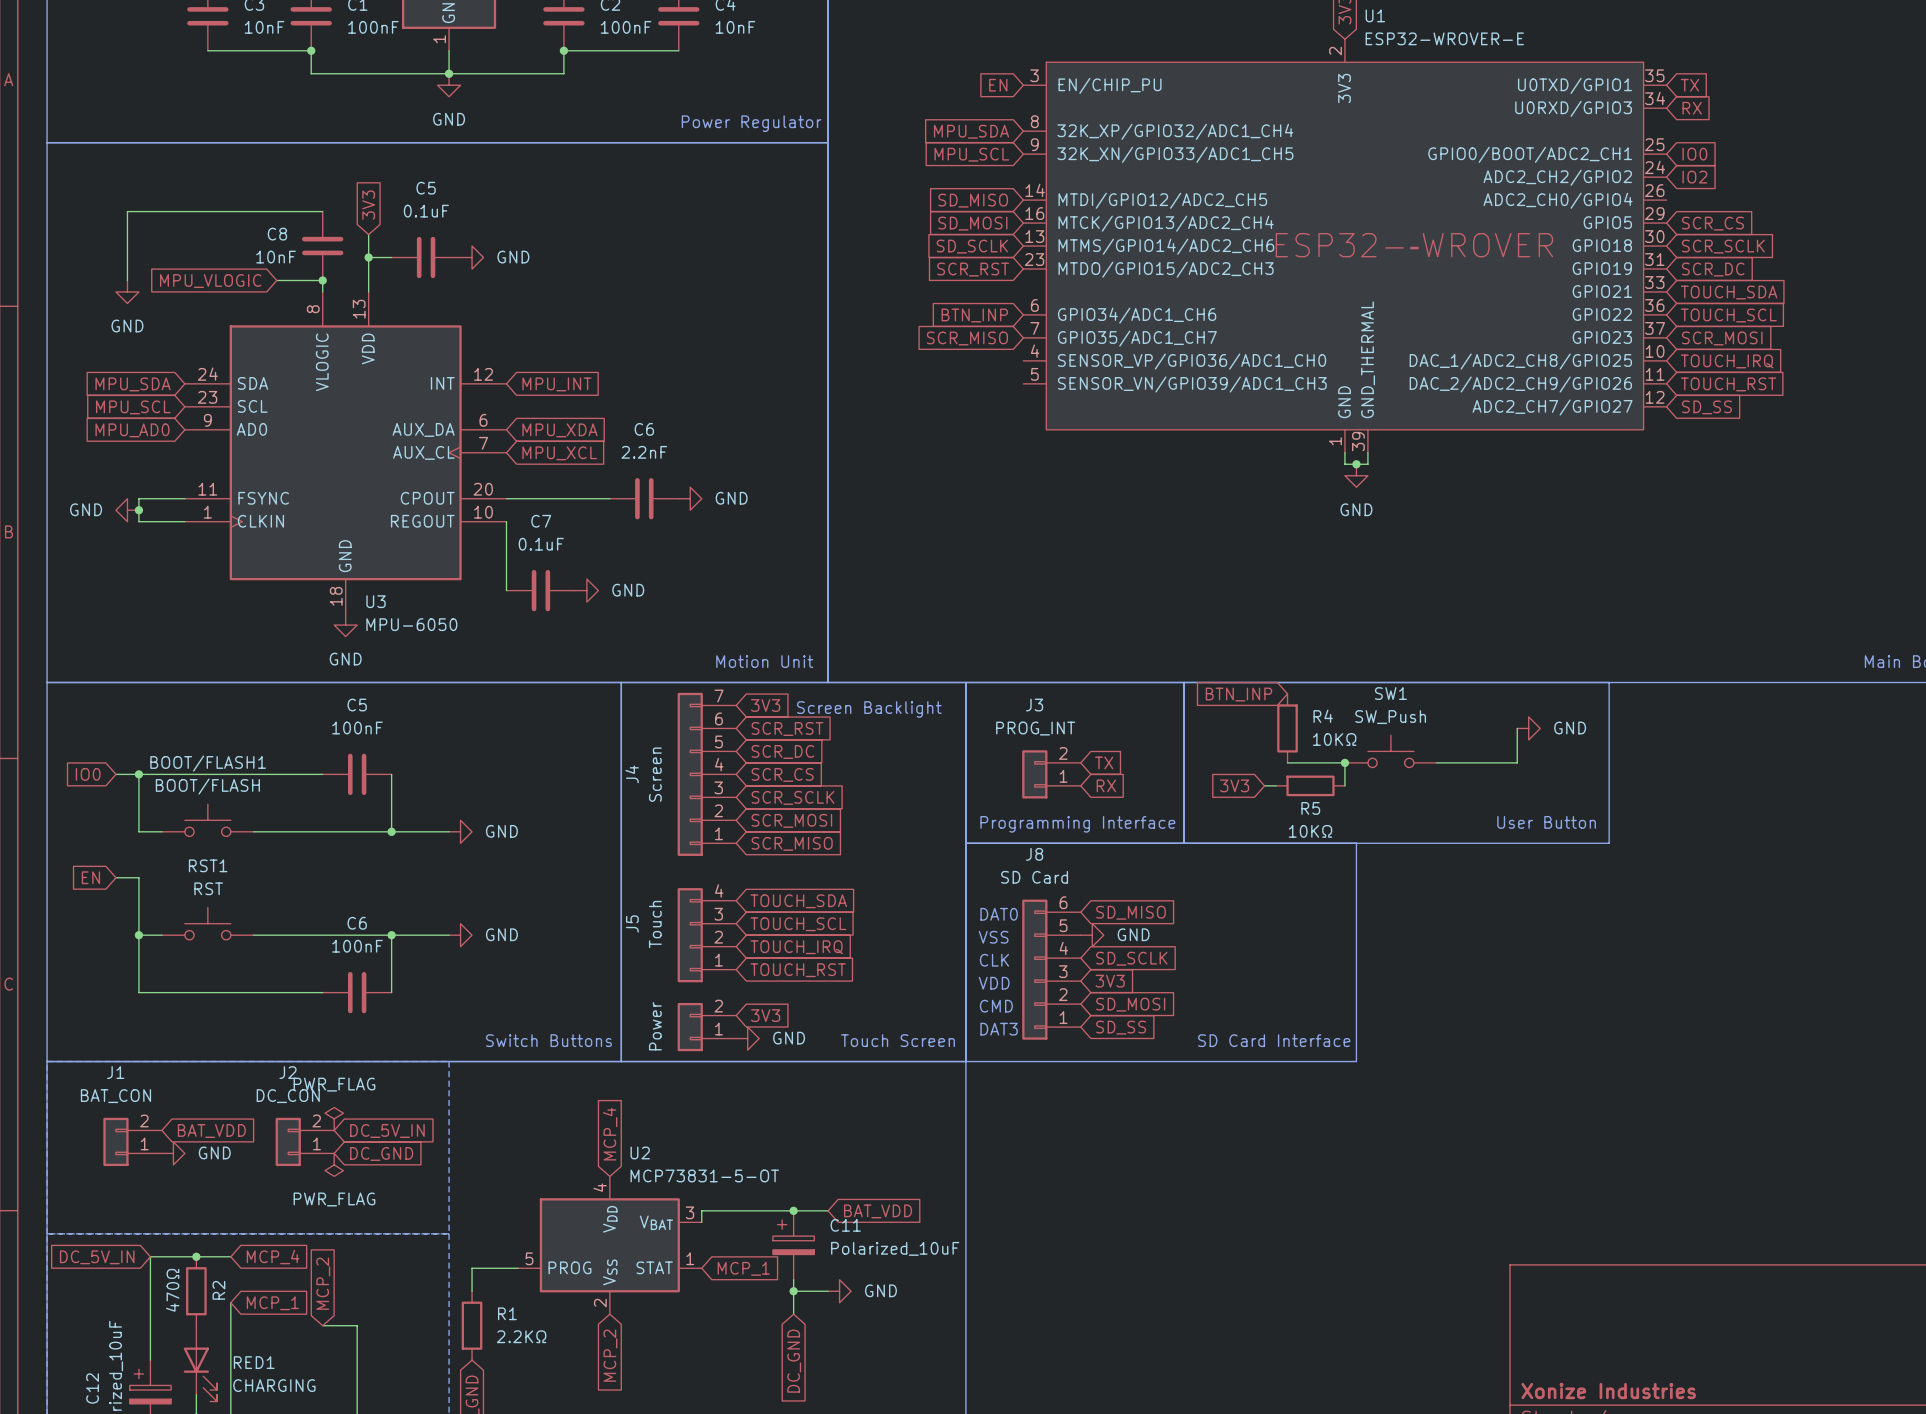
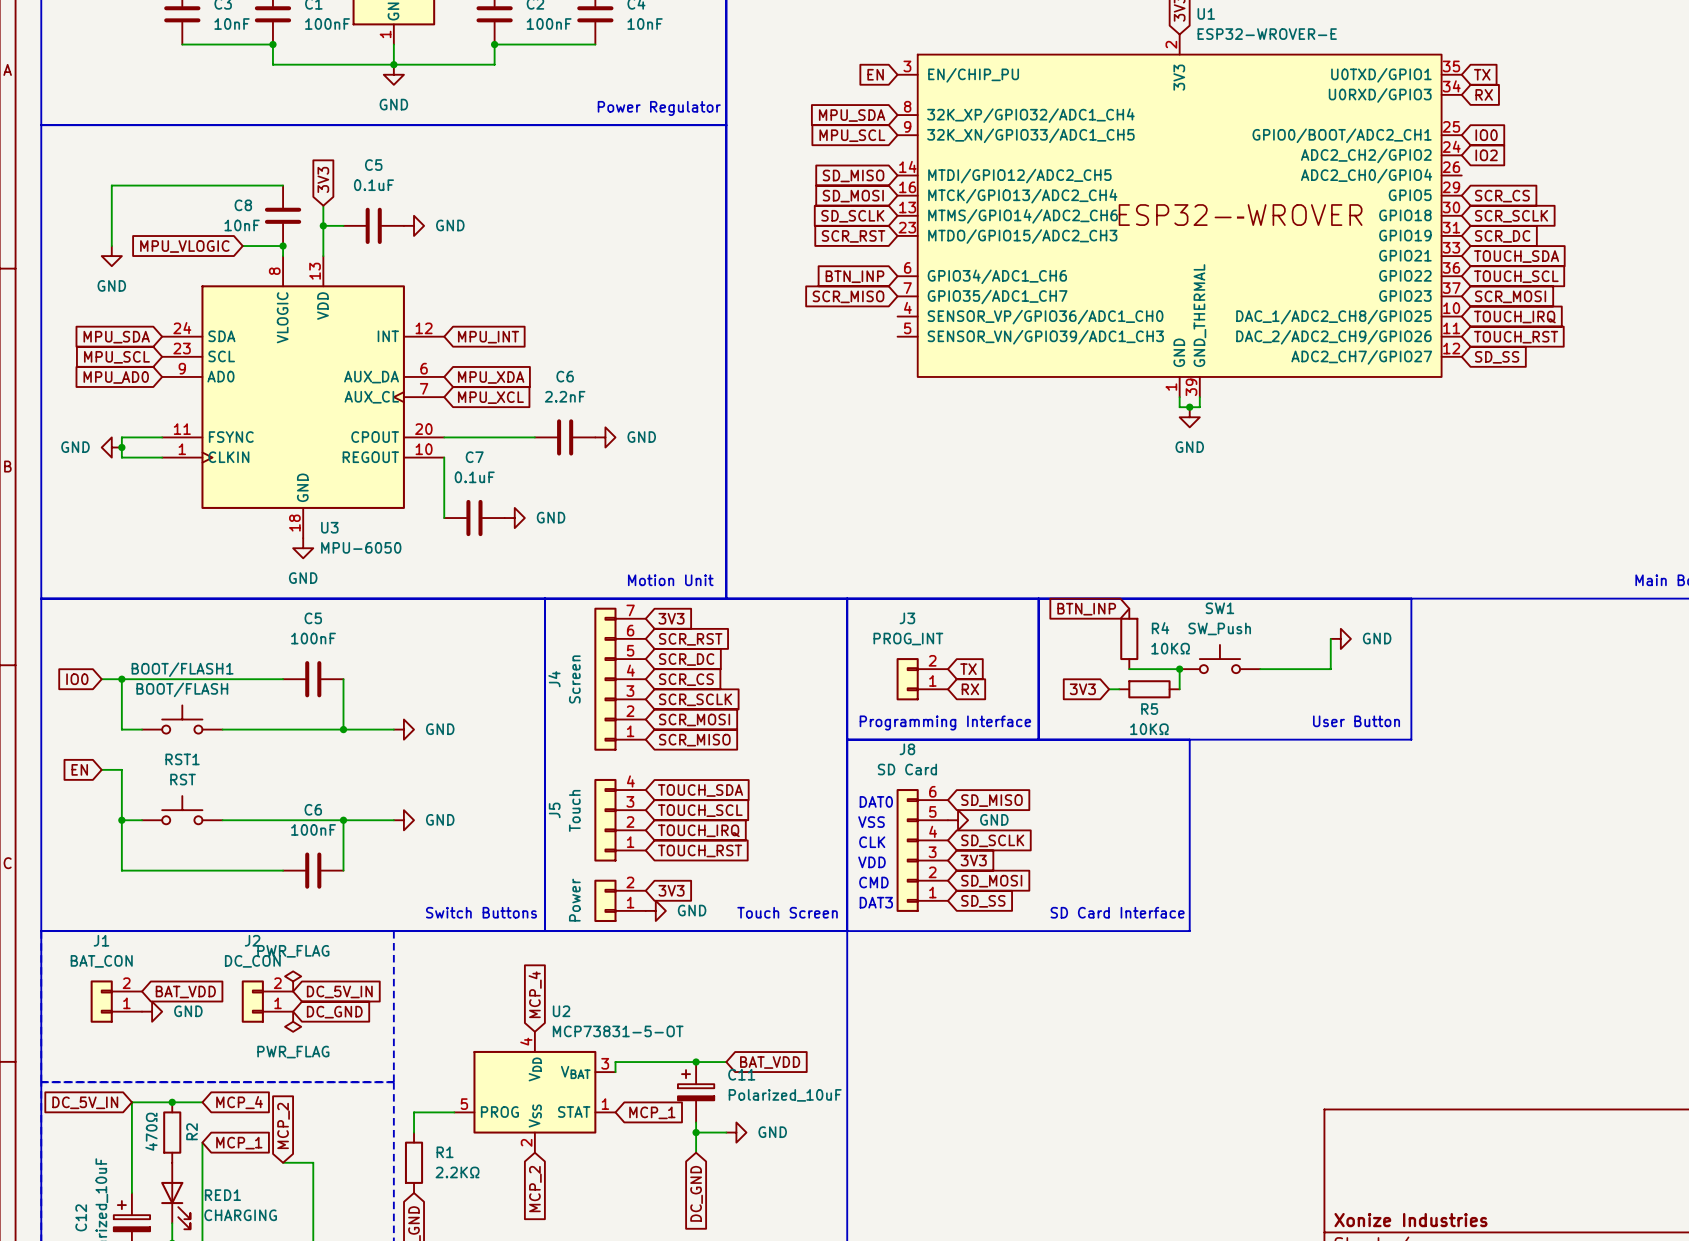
text: Screen Backlight (869, 709) -> none

